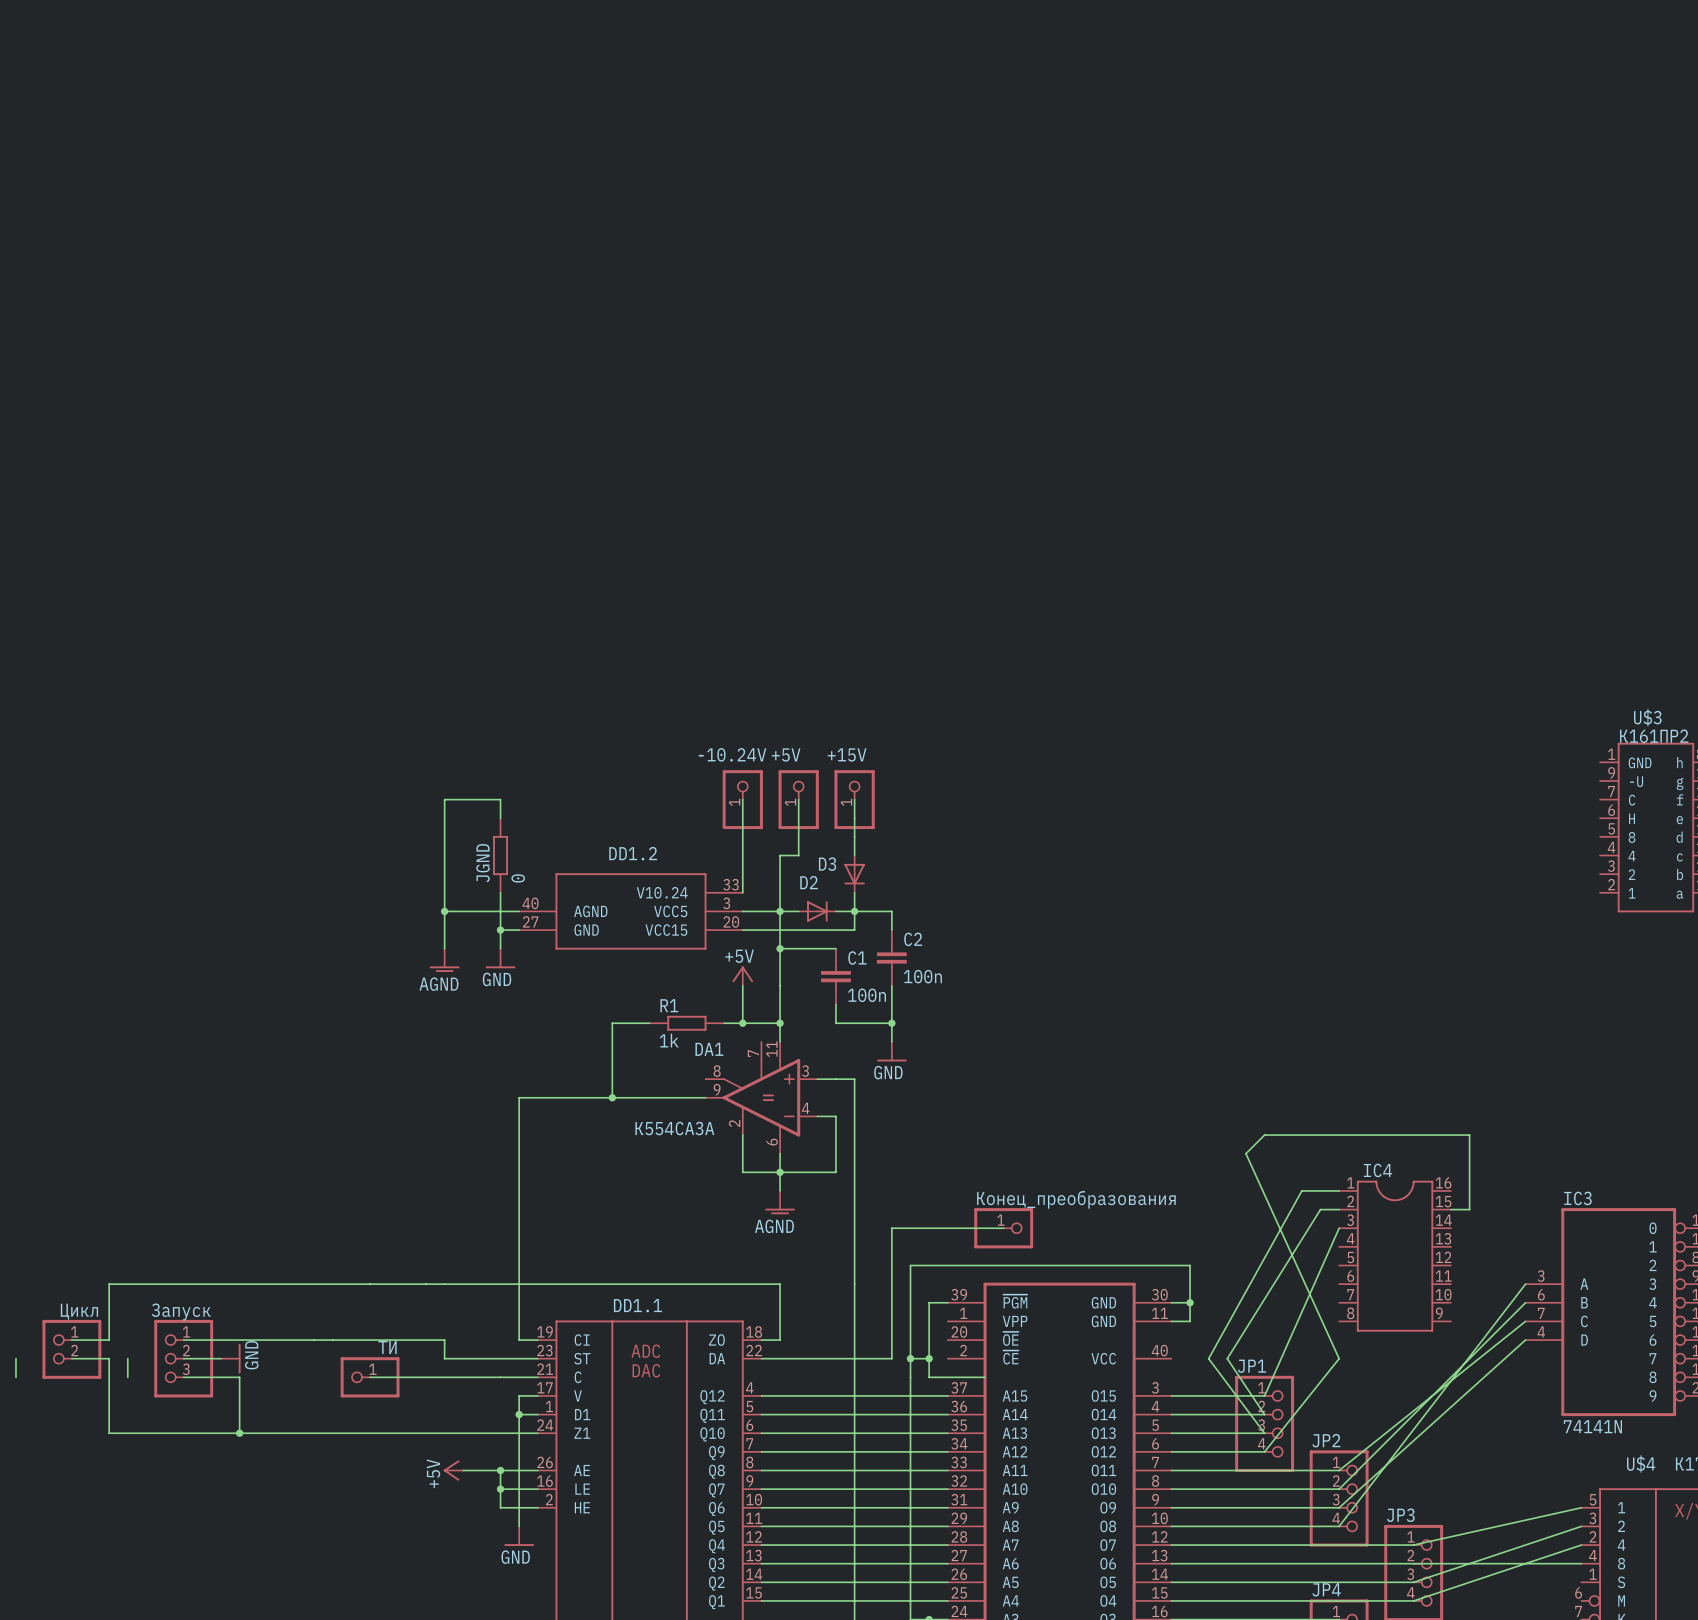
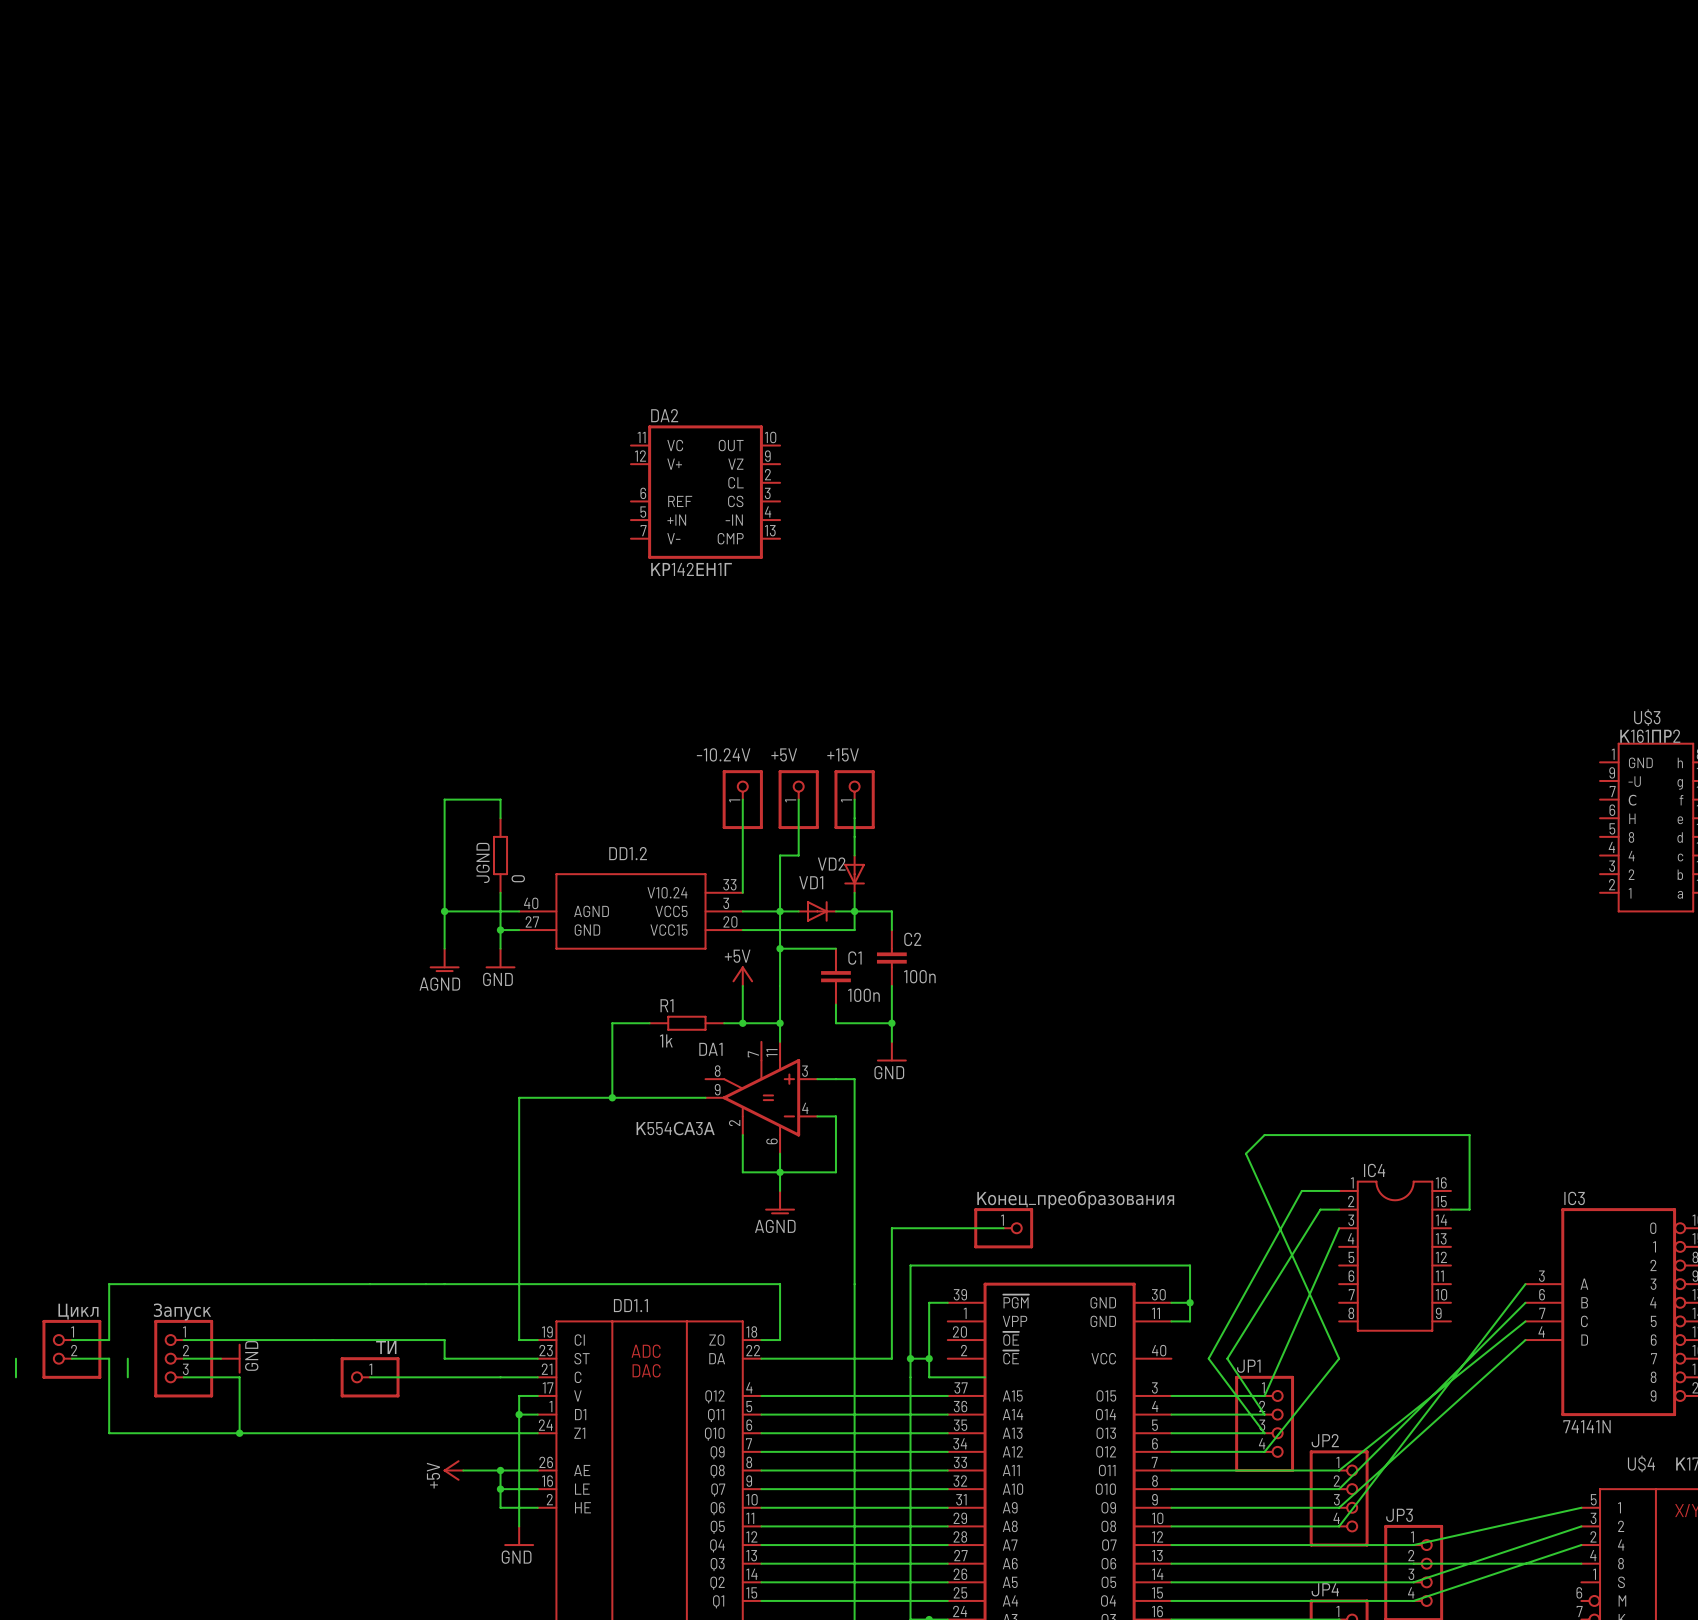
DA2: none -> КР142ЕН1Г (705, 492)
D3 name: D3 (827, 864) -> VD2 (831, 864)
D2 name: D2 (809, 882) -> VD1 (811, 882)

